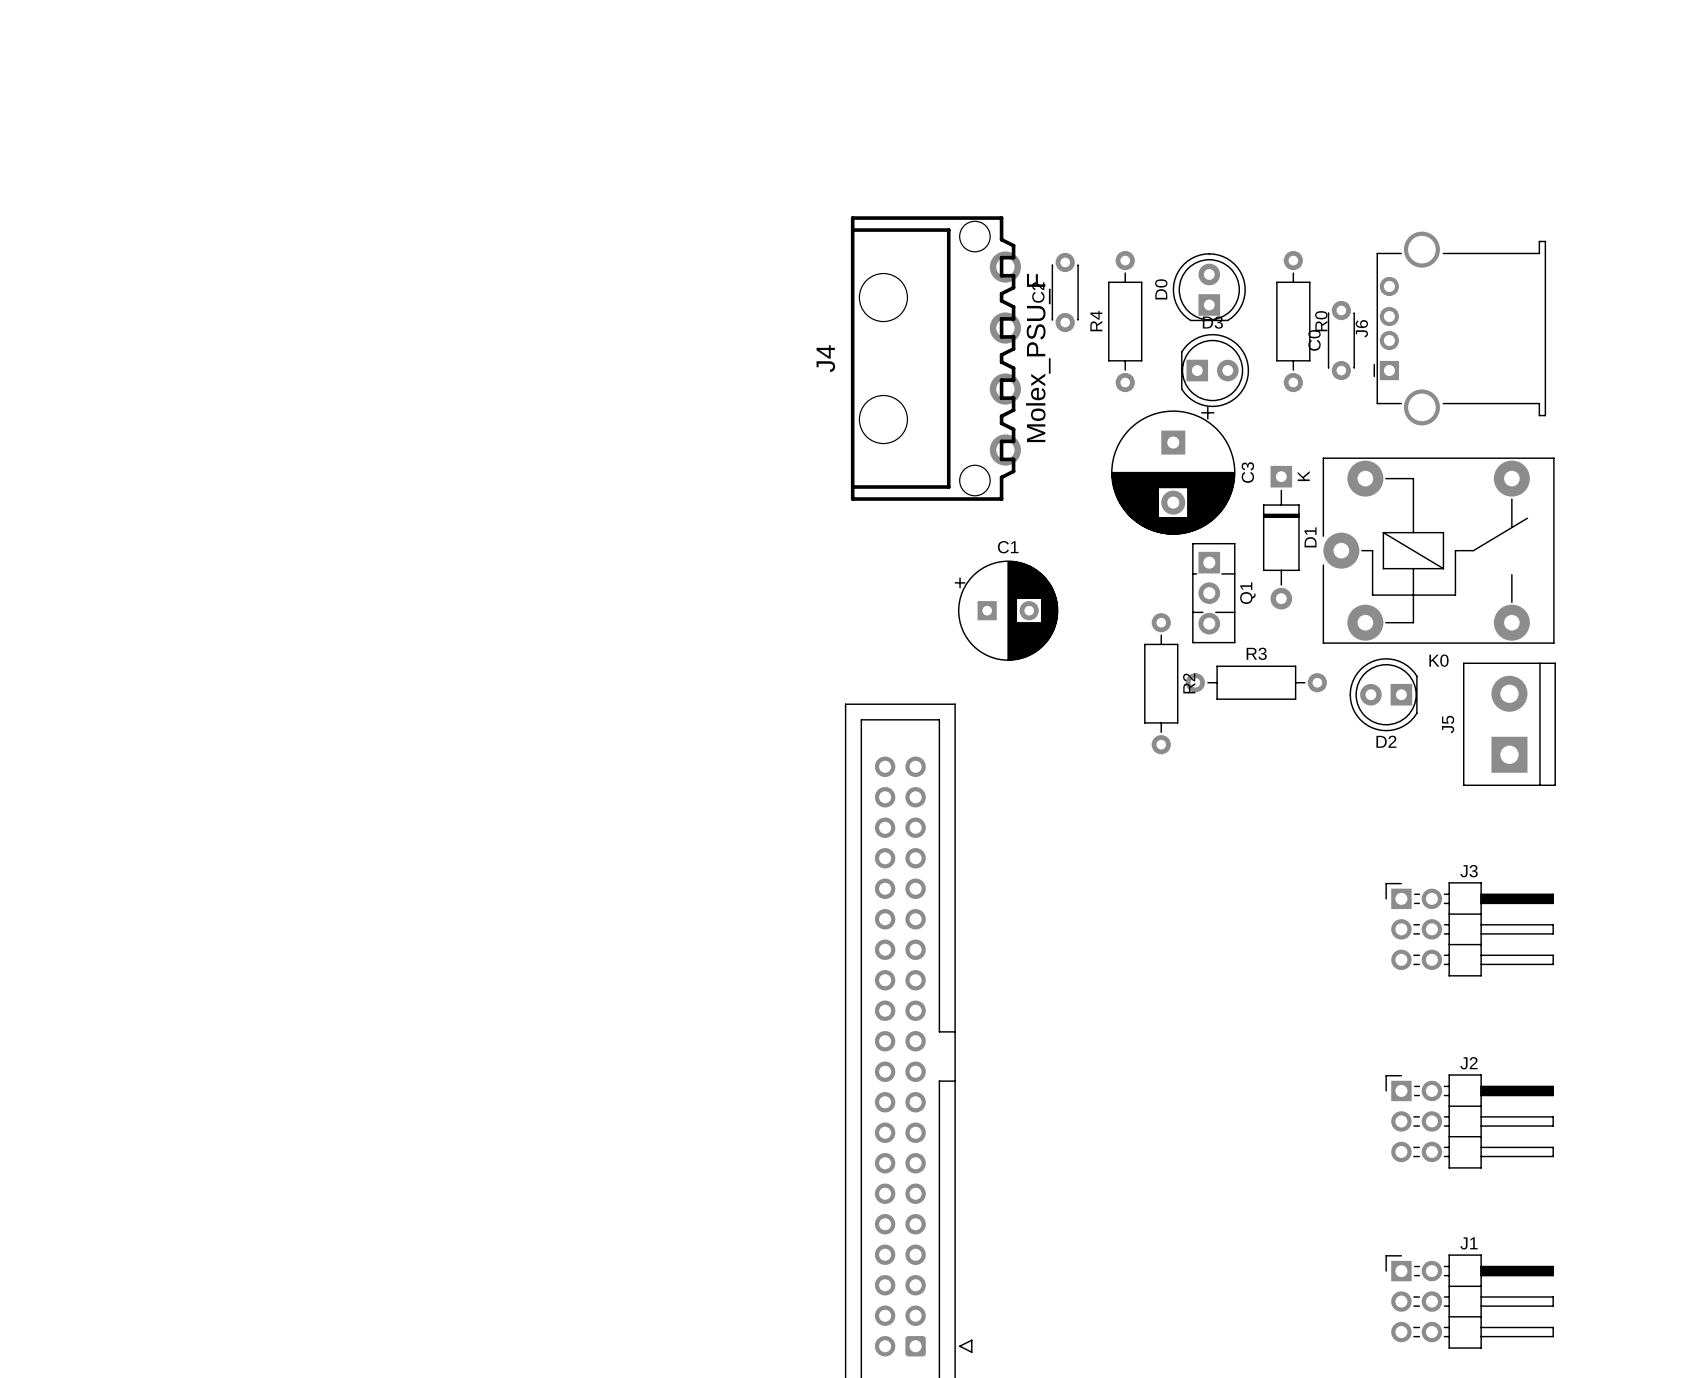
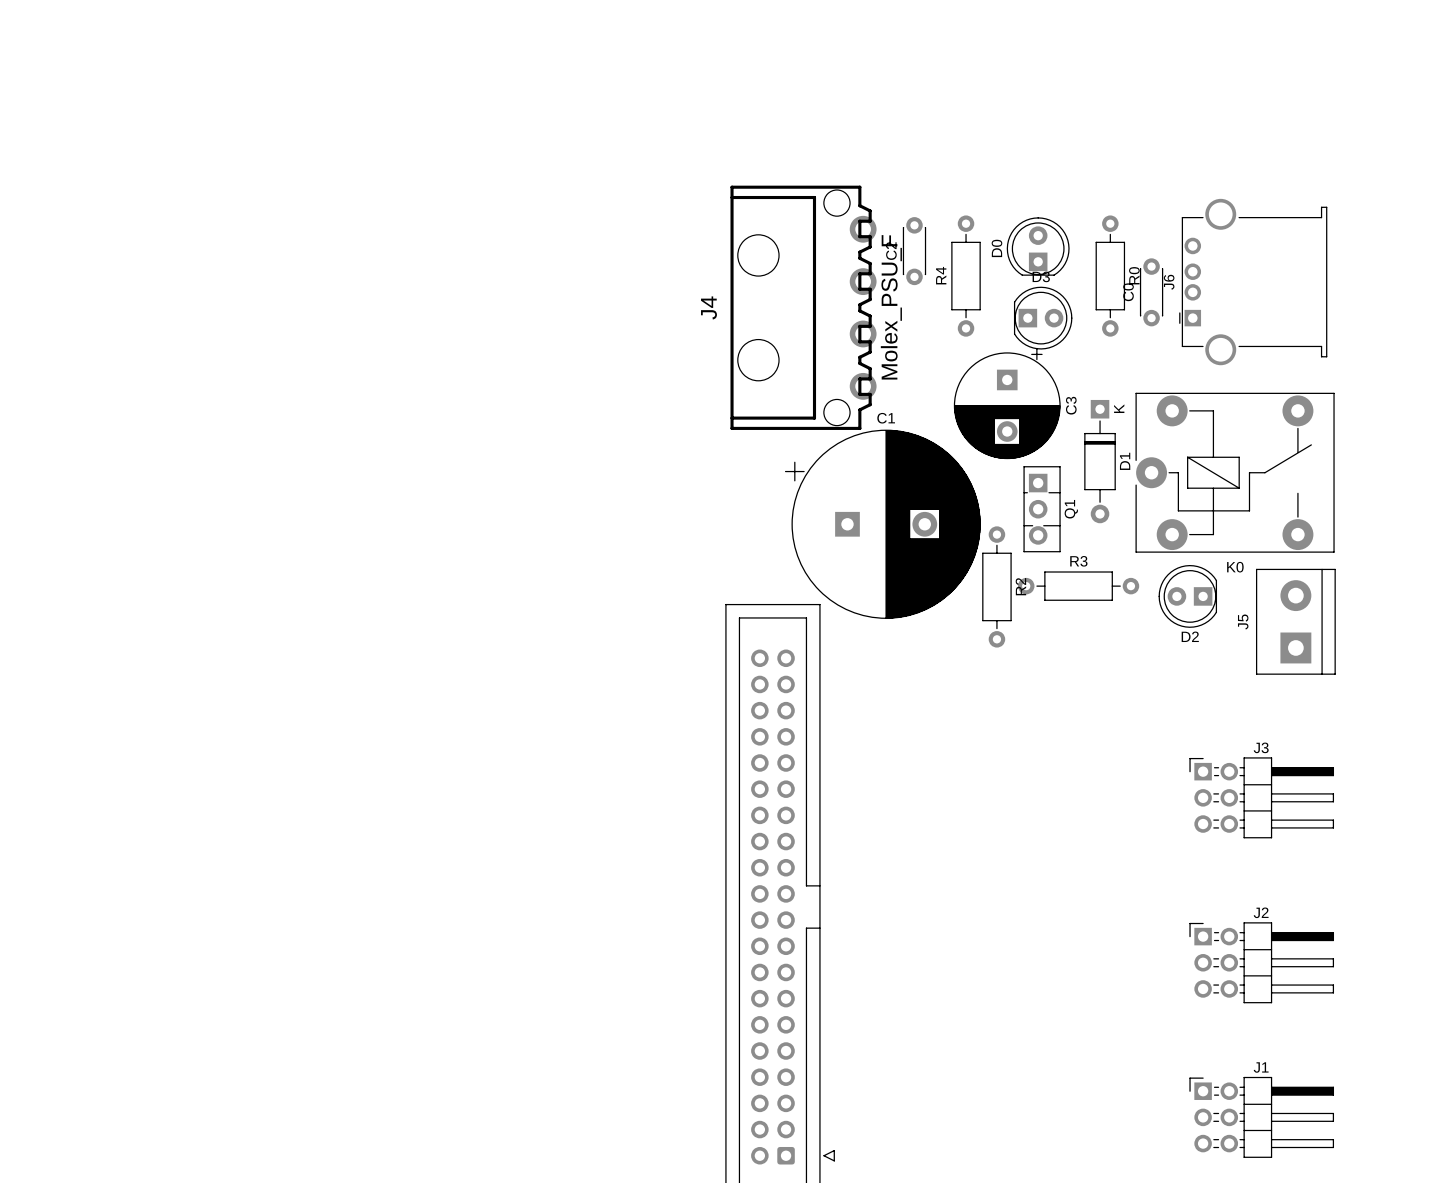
C1 name position: C1 (1008, 547) -> C1 (886, 418)
C1 footprint: [954, 560, 1059, 661] -> [784, 429, 981, 619]

